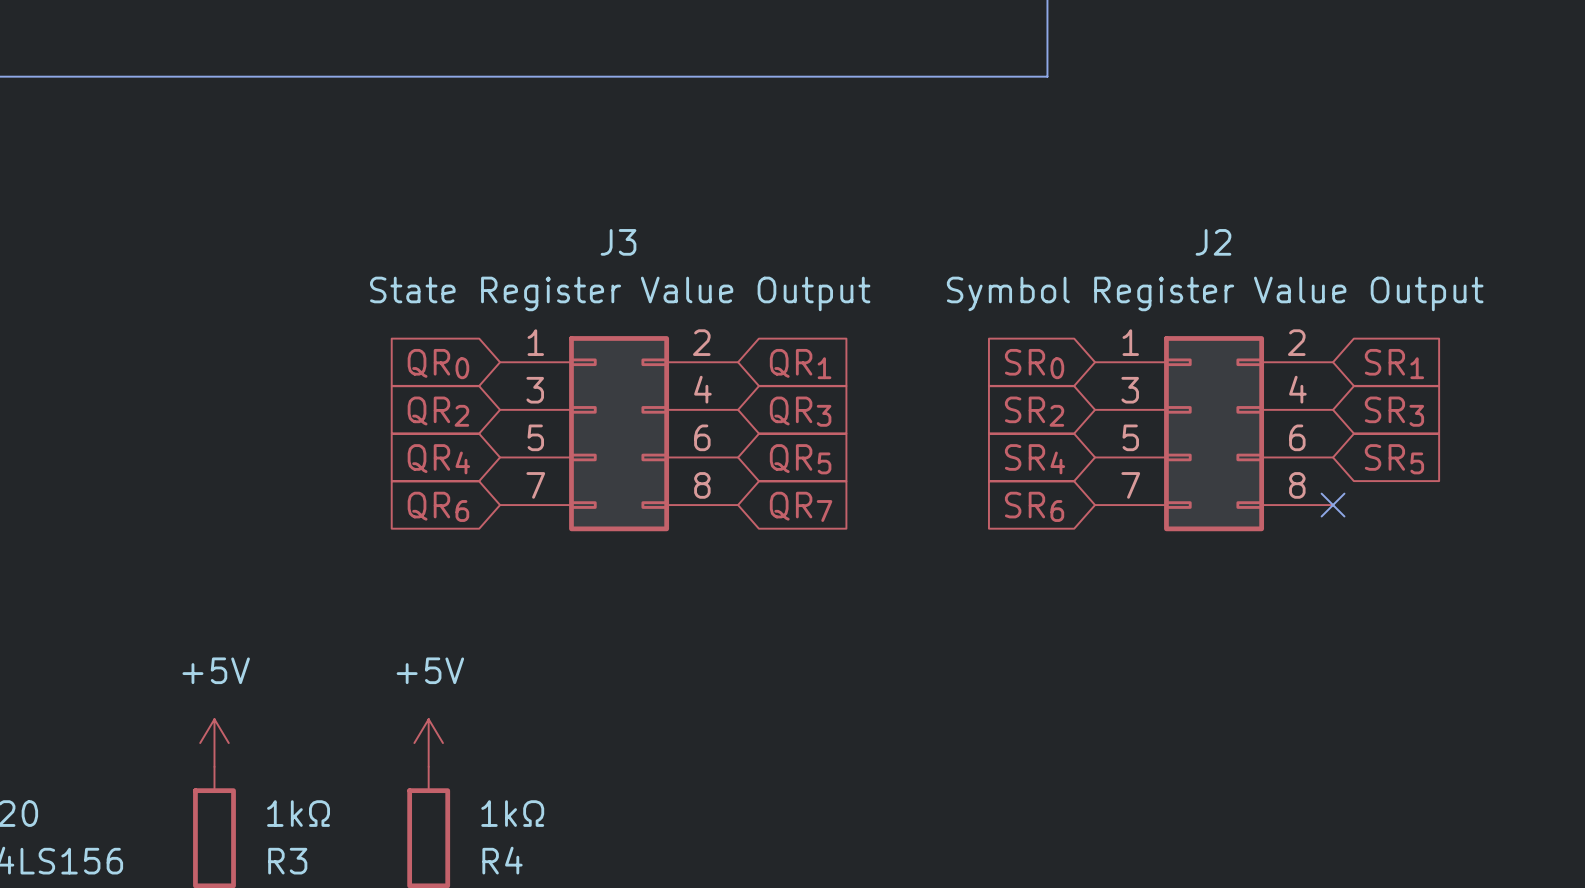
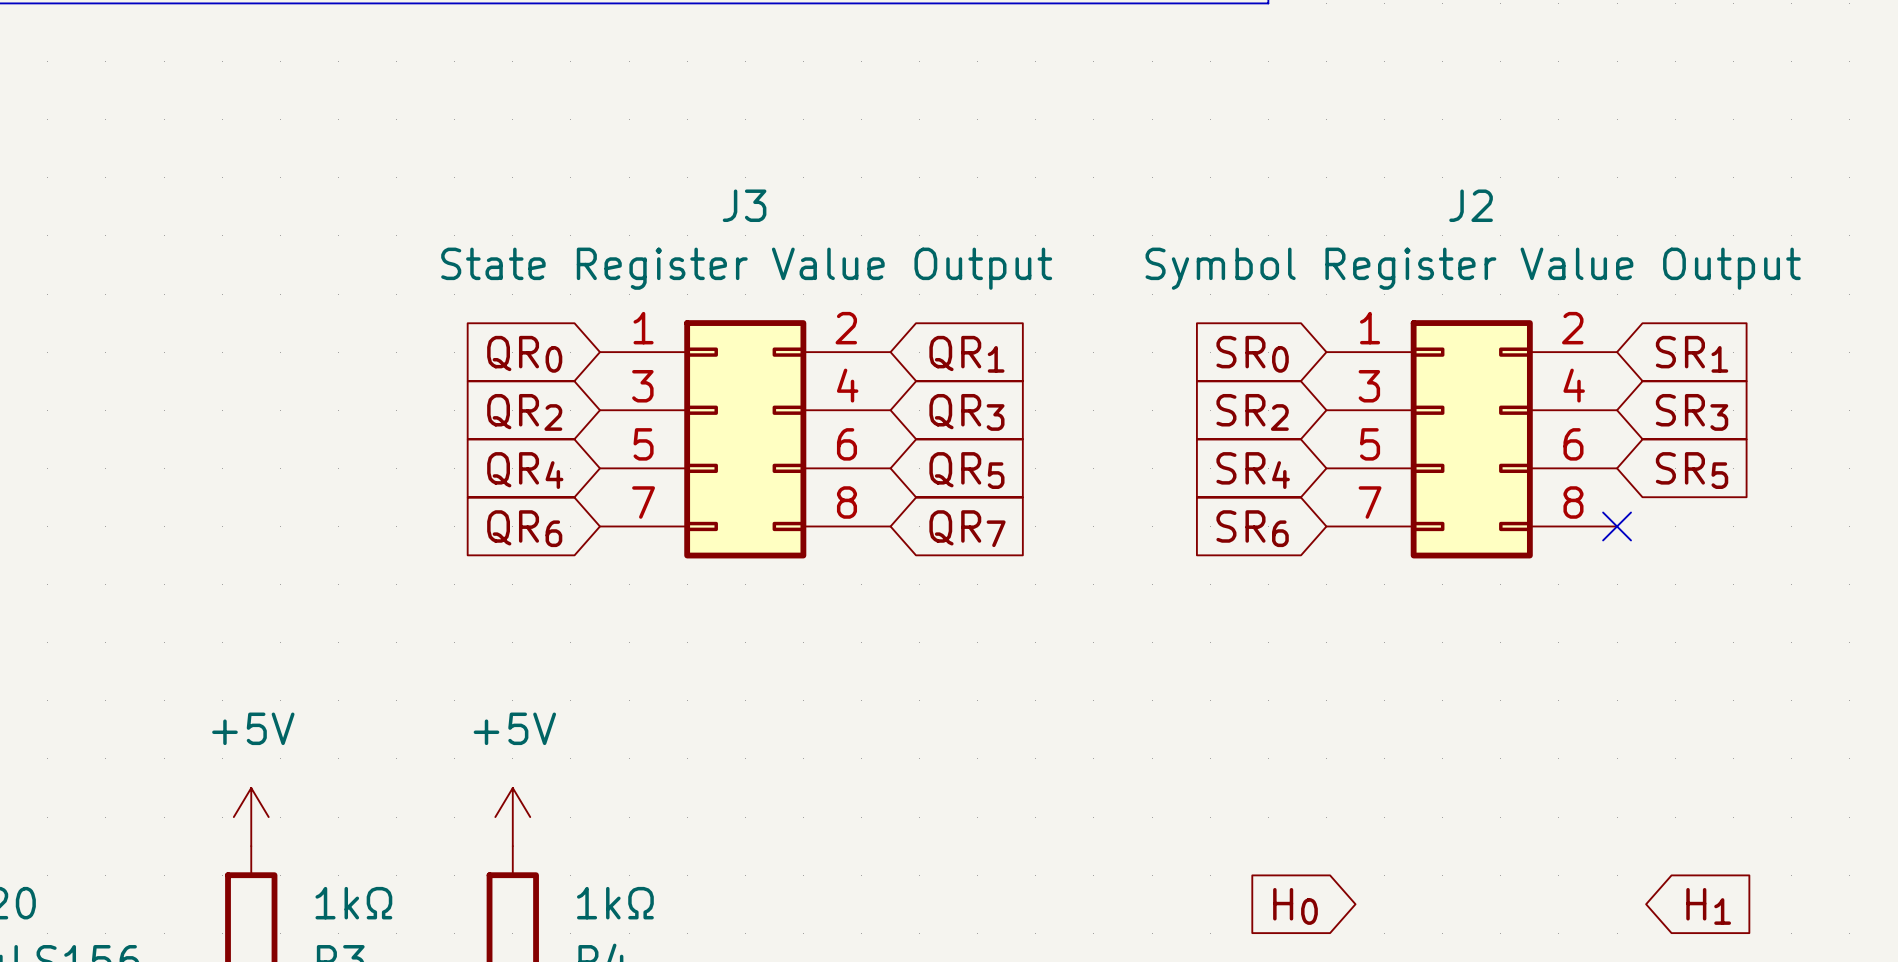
global label: none -> H0 (1295, 906)
global label: none -> H1 (1708, 906)

